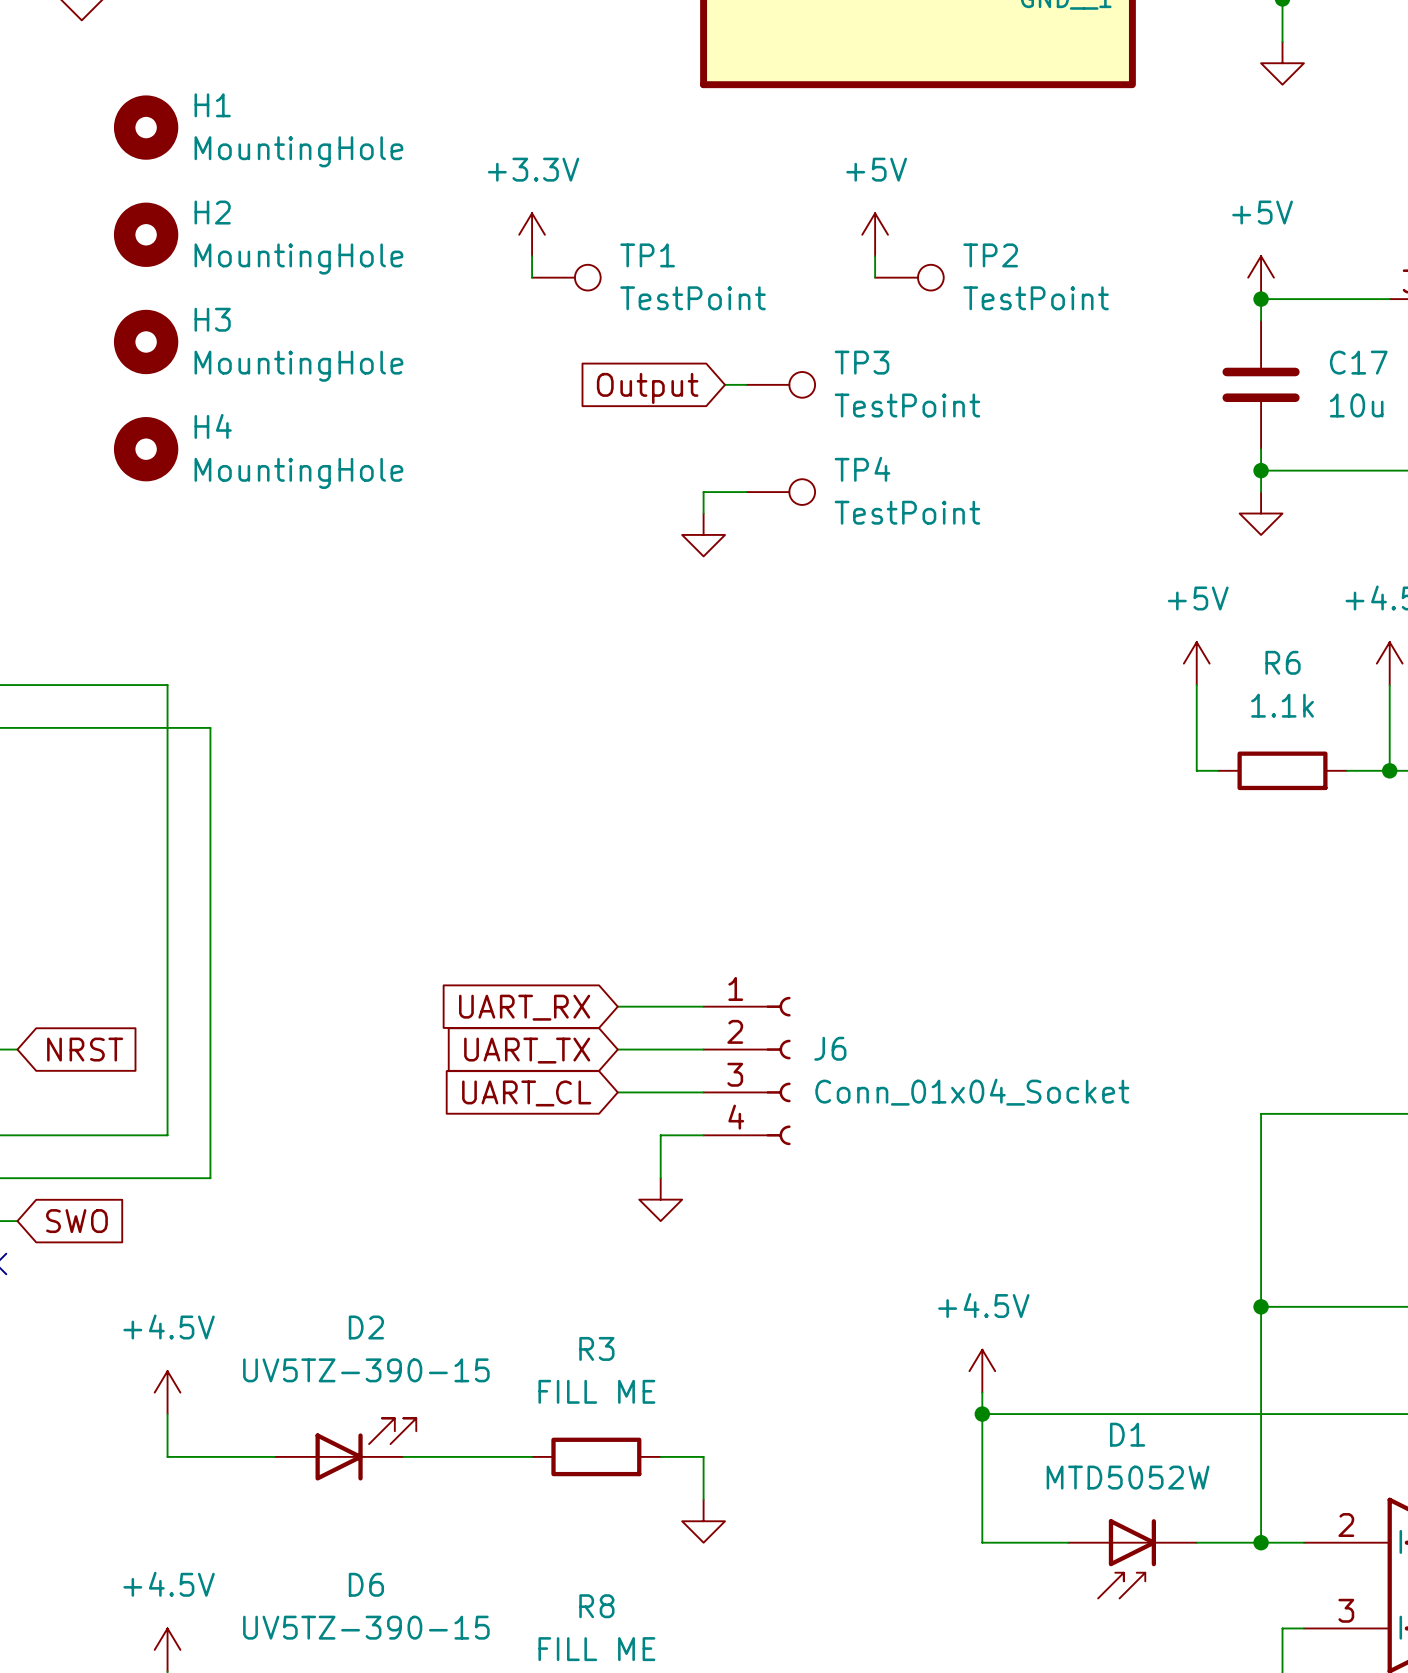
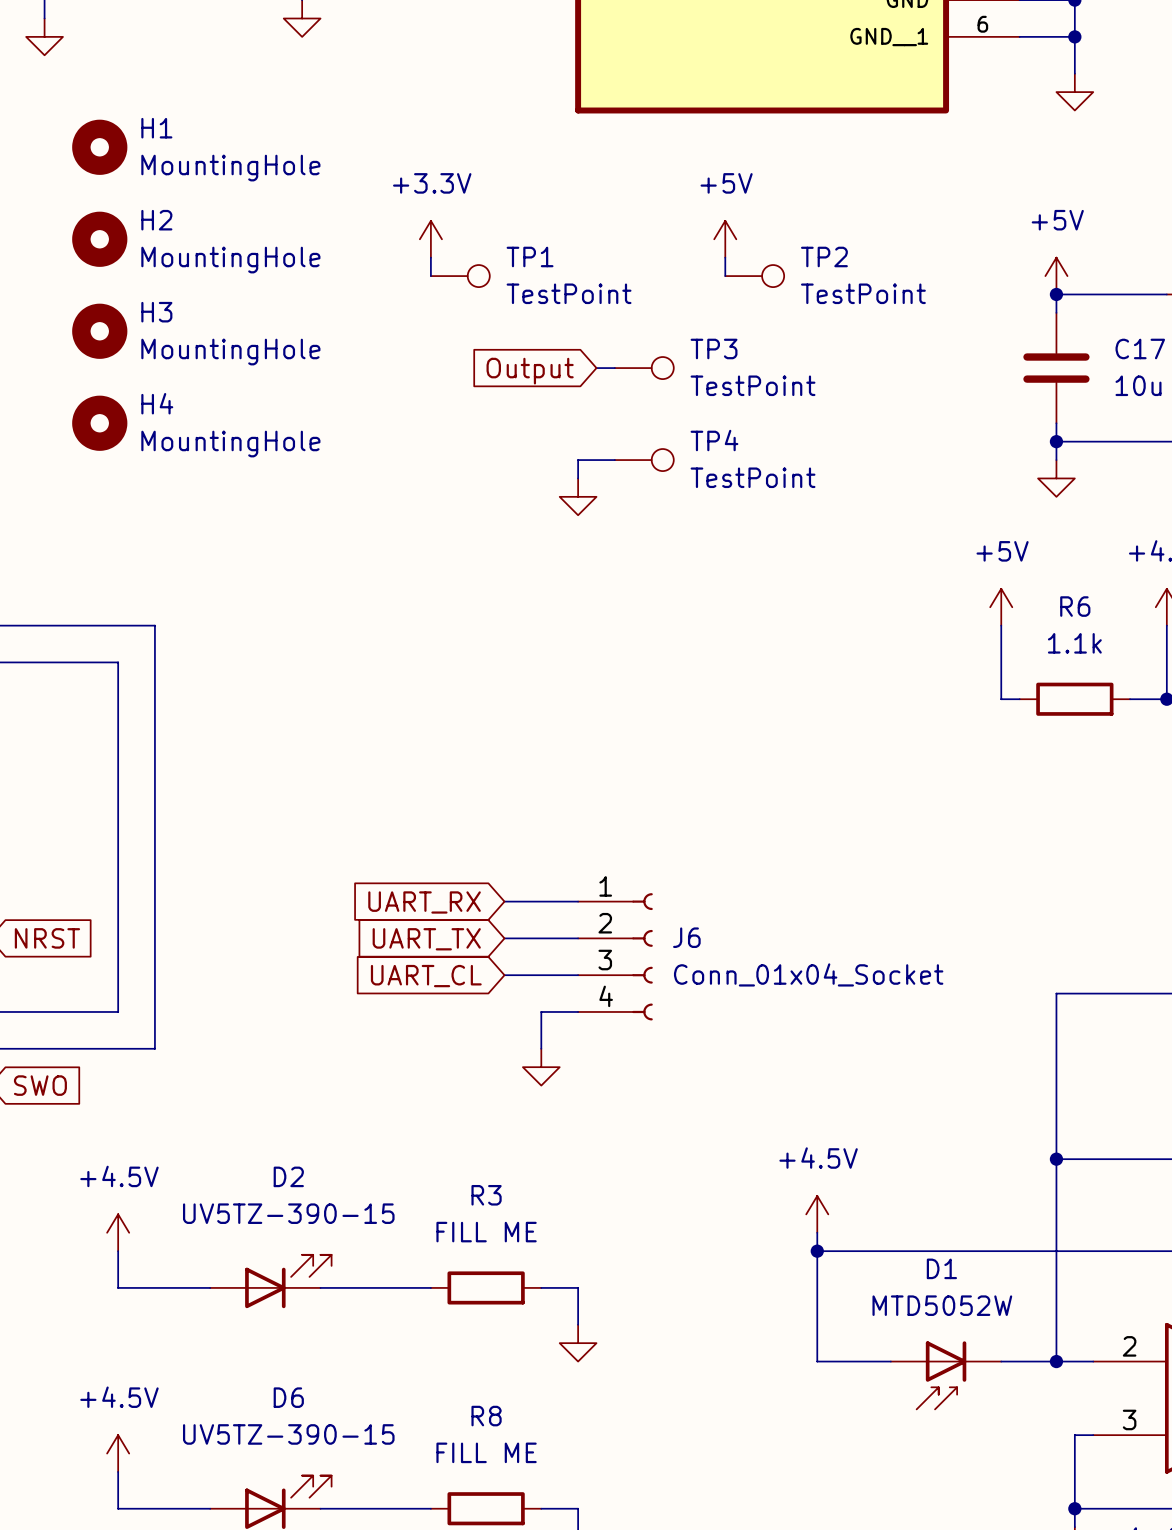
wire: (167, 685) (167, 727) (210, 727) -> (118, 625) (154, 625) (154, 662)

